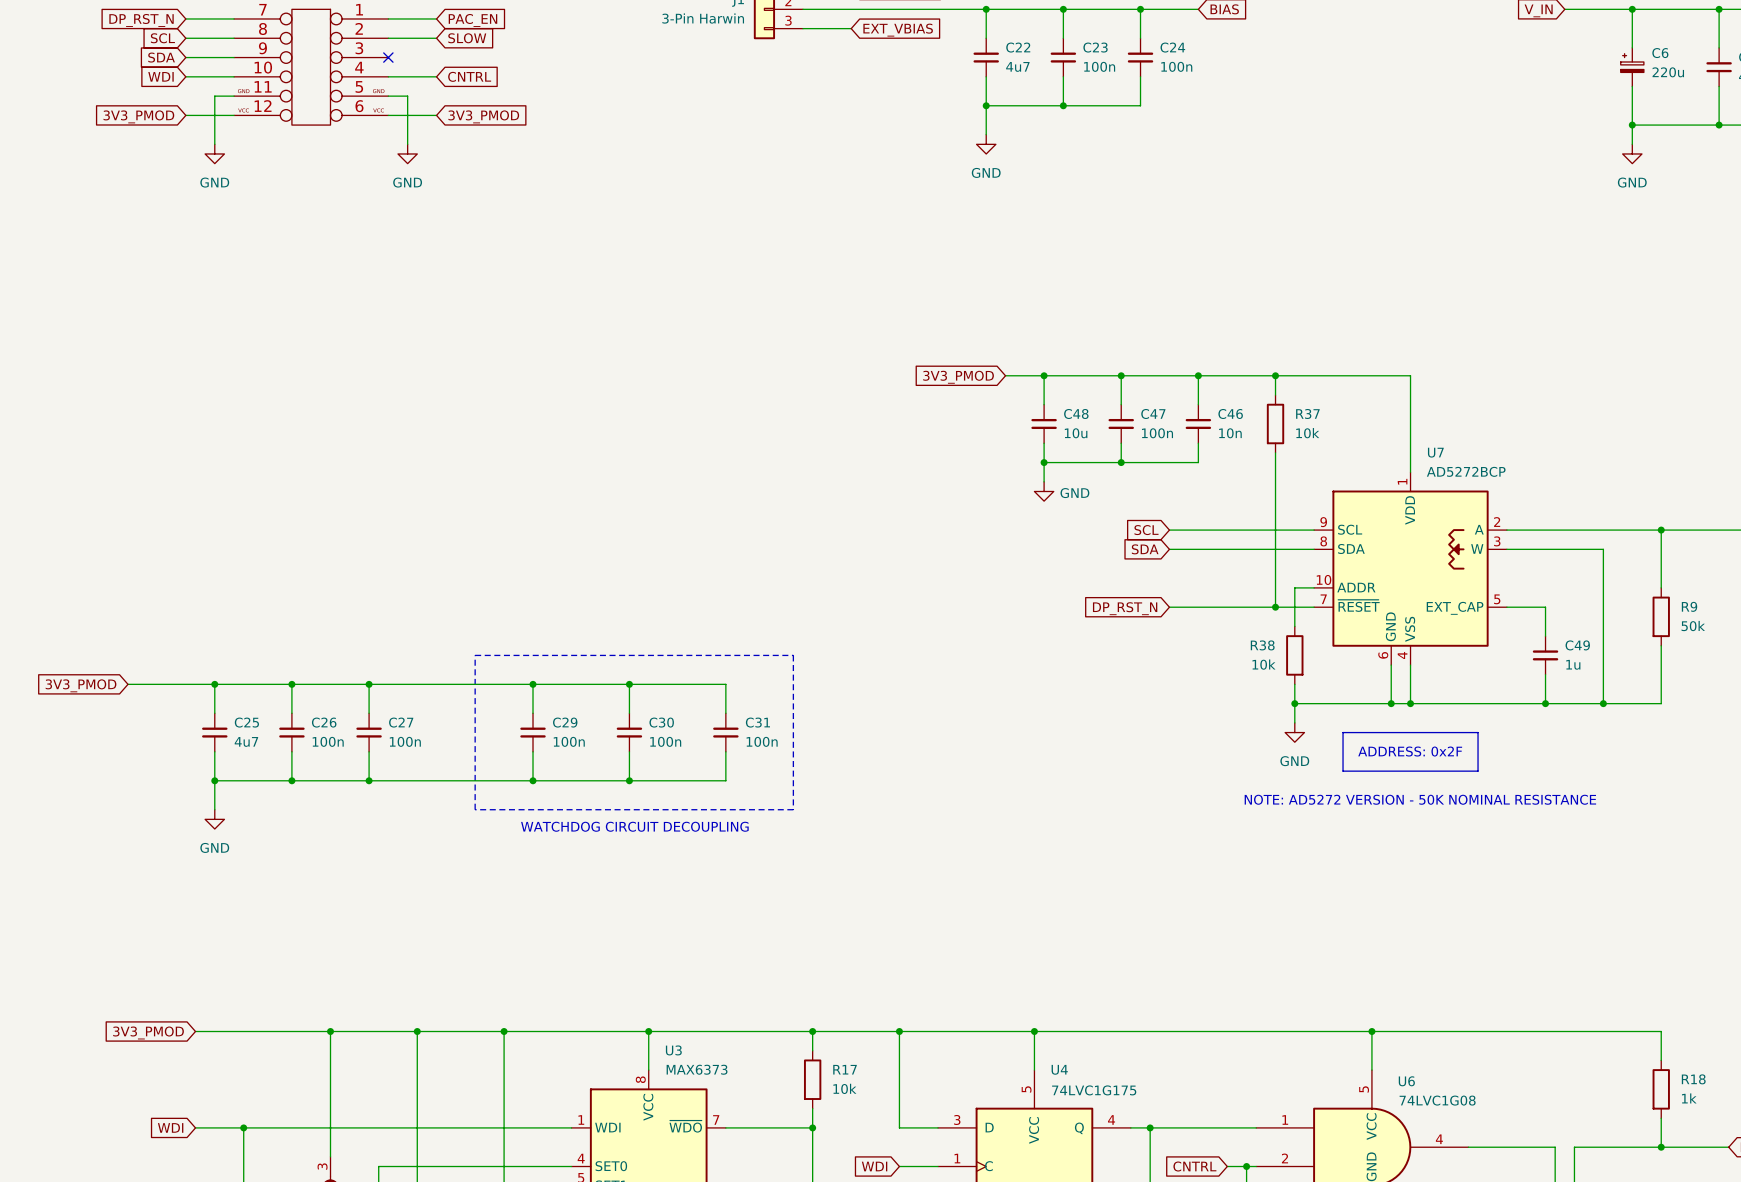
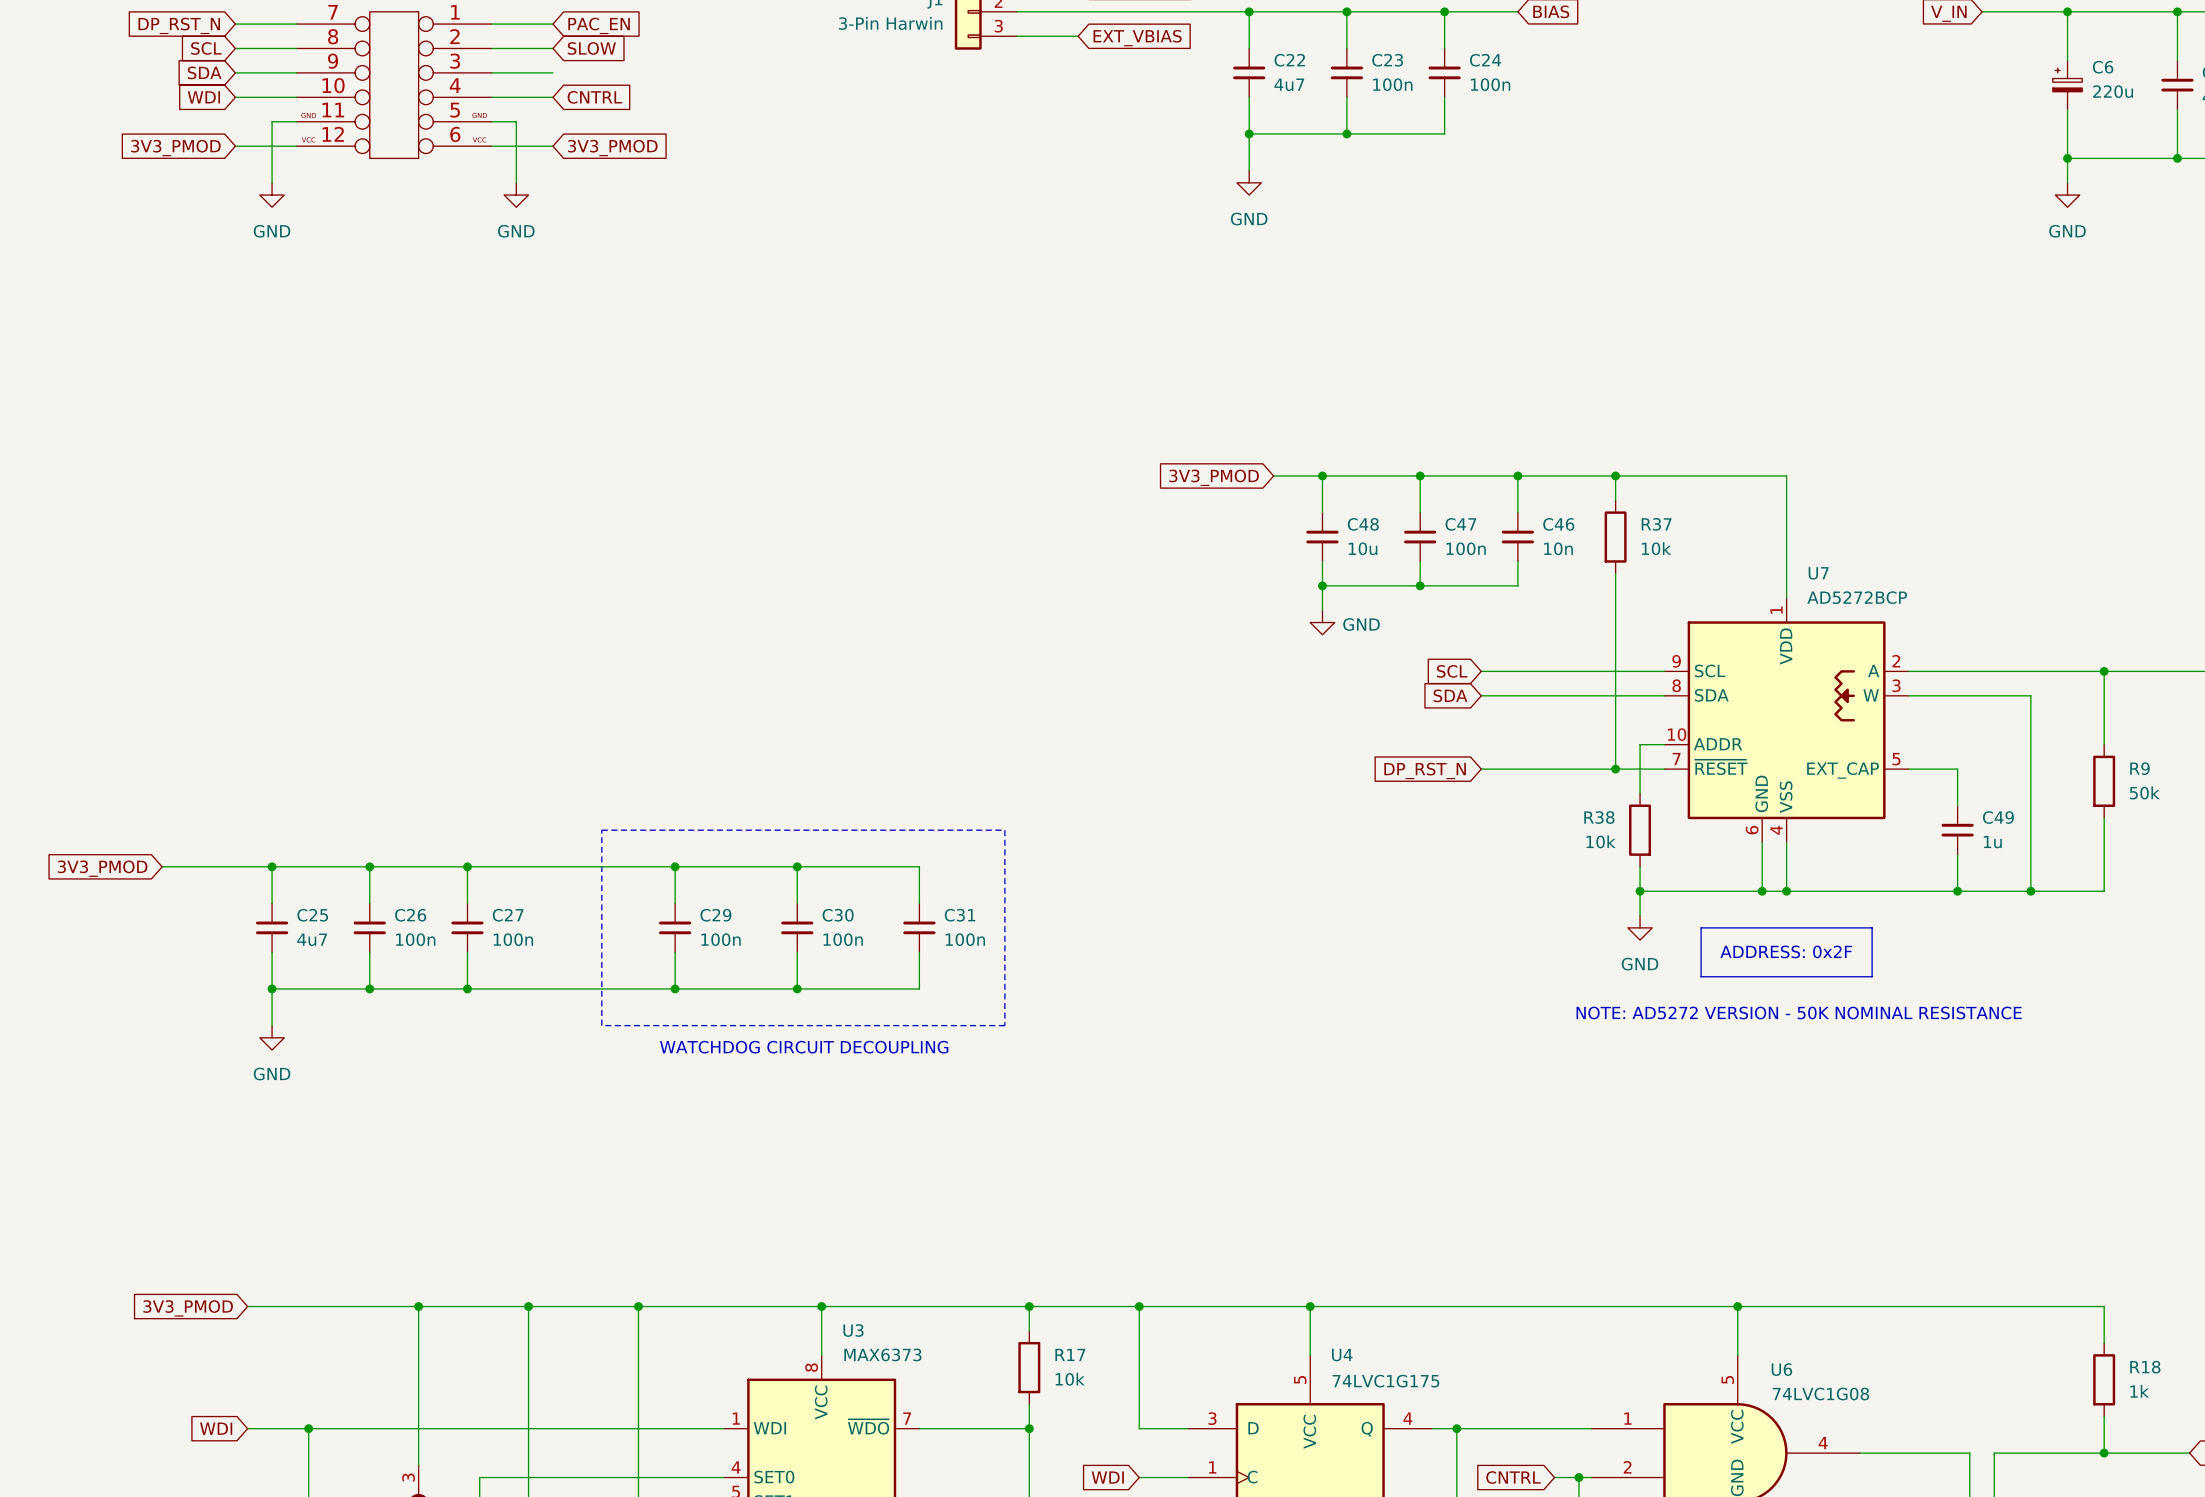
wire: none -> (491, 72) (552, 72)
no-connect mark: (388, 57) -> none

